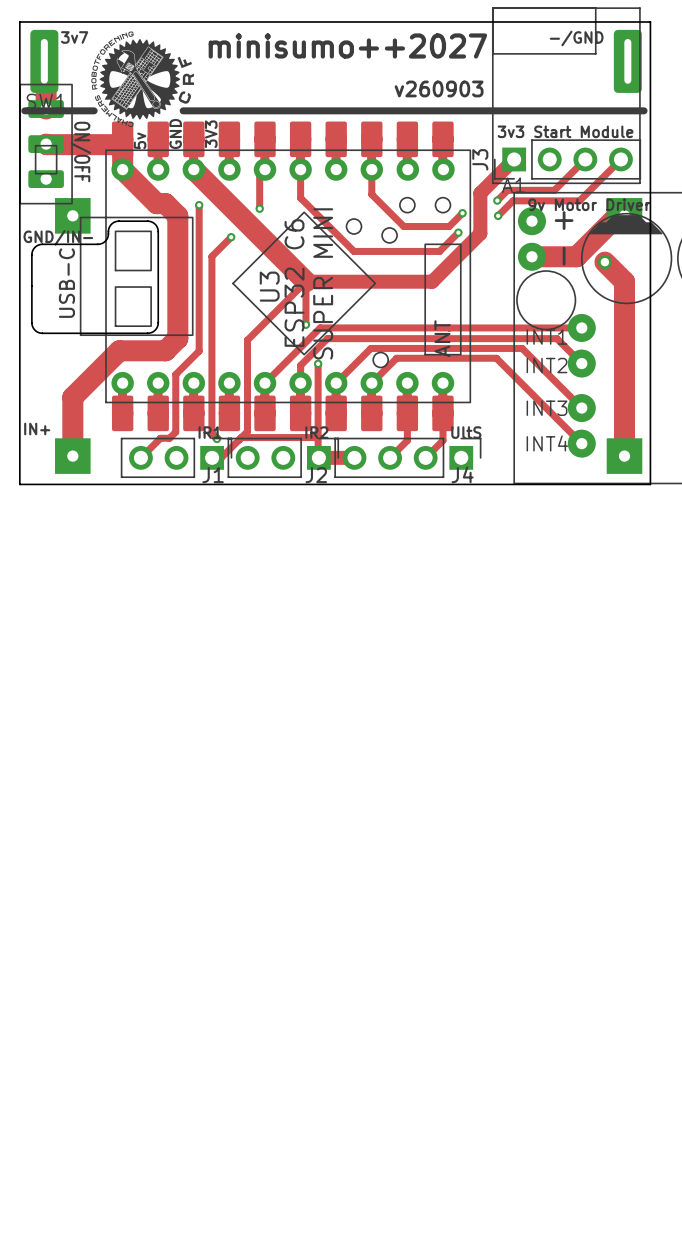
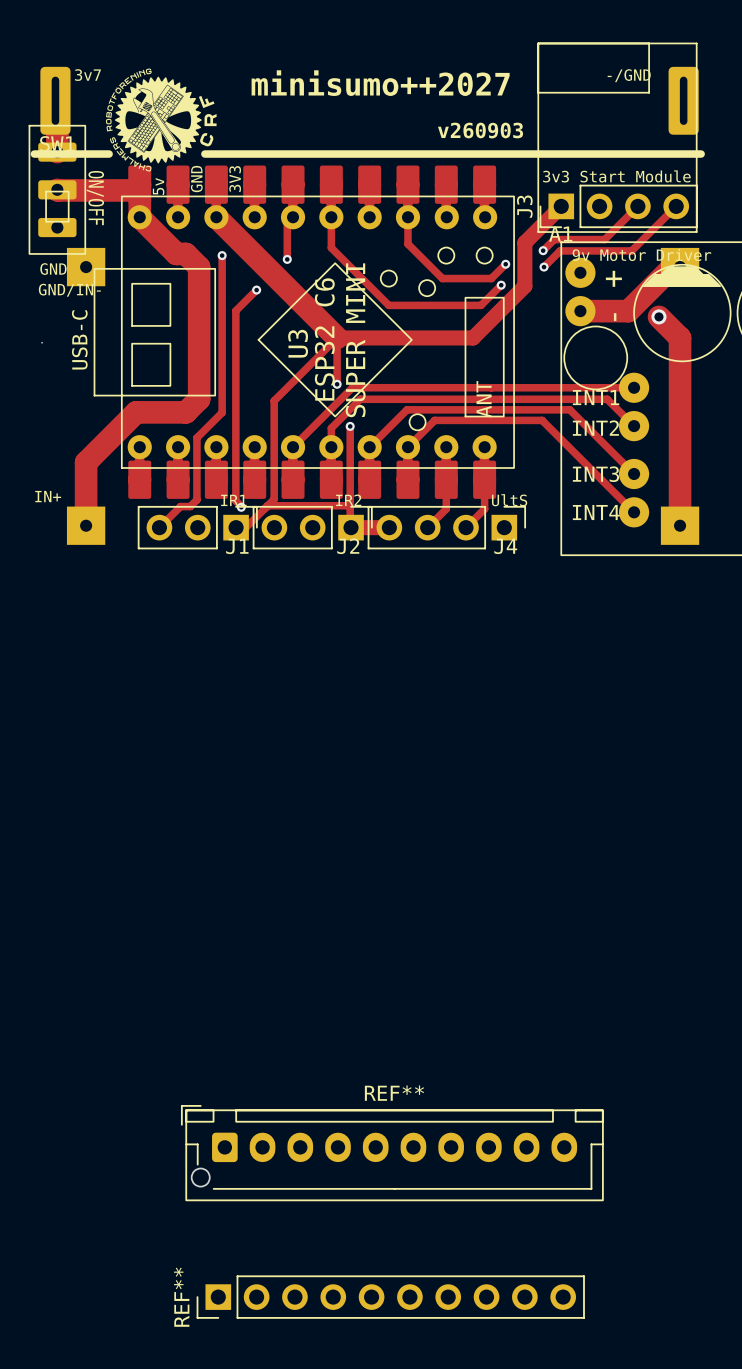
board edge: (19, 22) (650, 22) (650, 484) (19, 484) (19, 22) -> none
text: none -> GND (53, 269)
board edge: (118, 221) (149, 221) (157, 227) (158, 322) (156, 329) (147, 333) (42, 333) (36, 331) (31, 322) (31, 254) (34, 248) (41, 244) (100, 243) (107, 239) (110, 225) (118, 221) -> none
REF**: none -> (392, 1153)
REF**: none -> (390, 1297)

